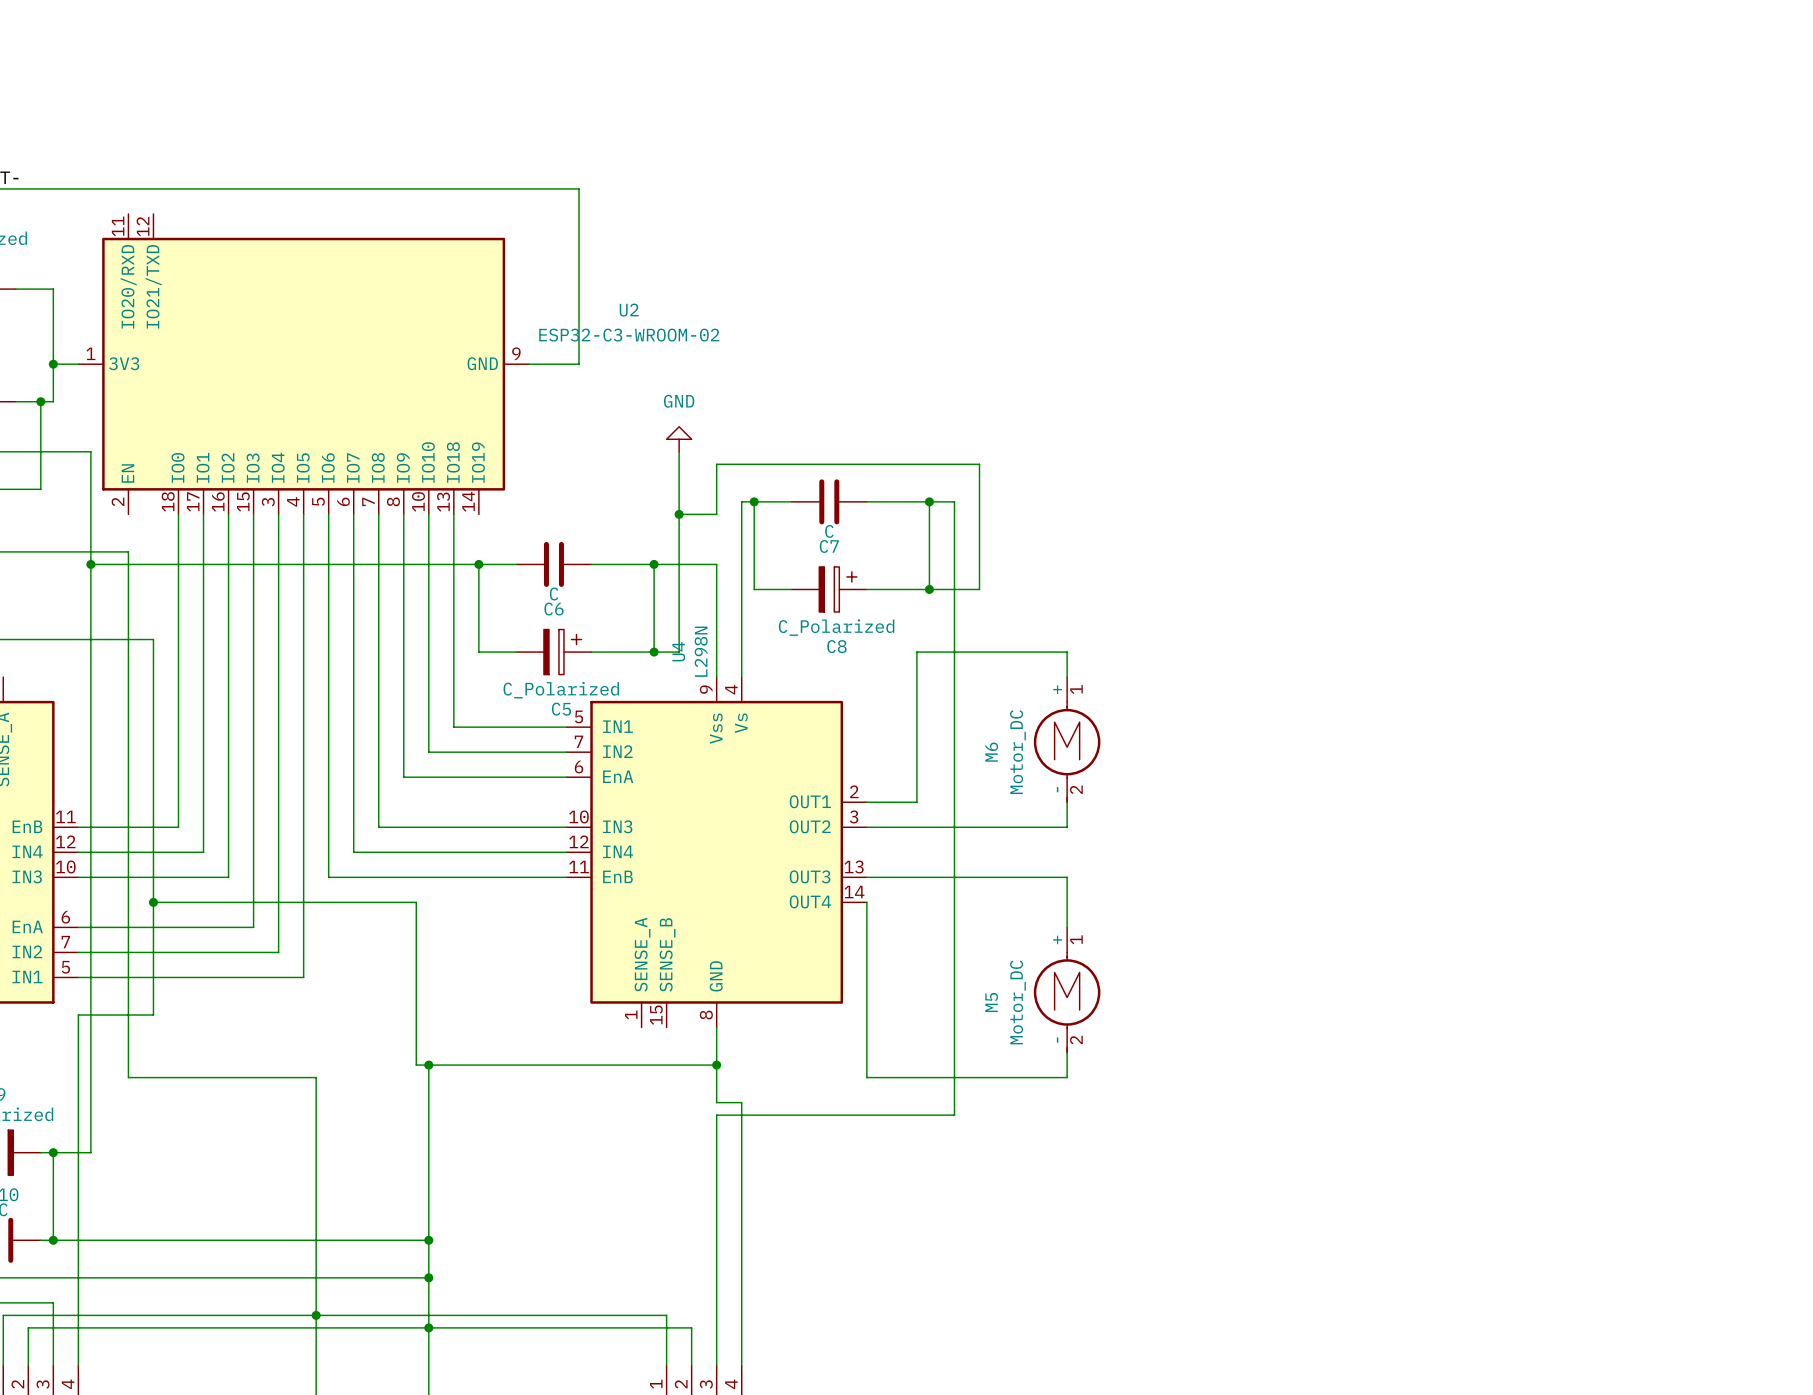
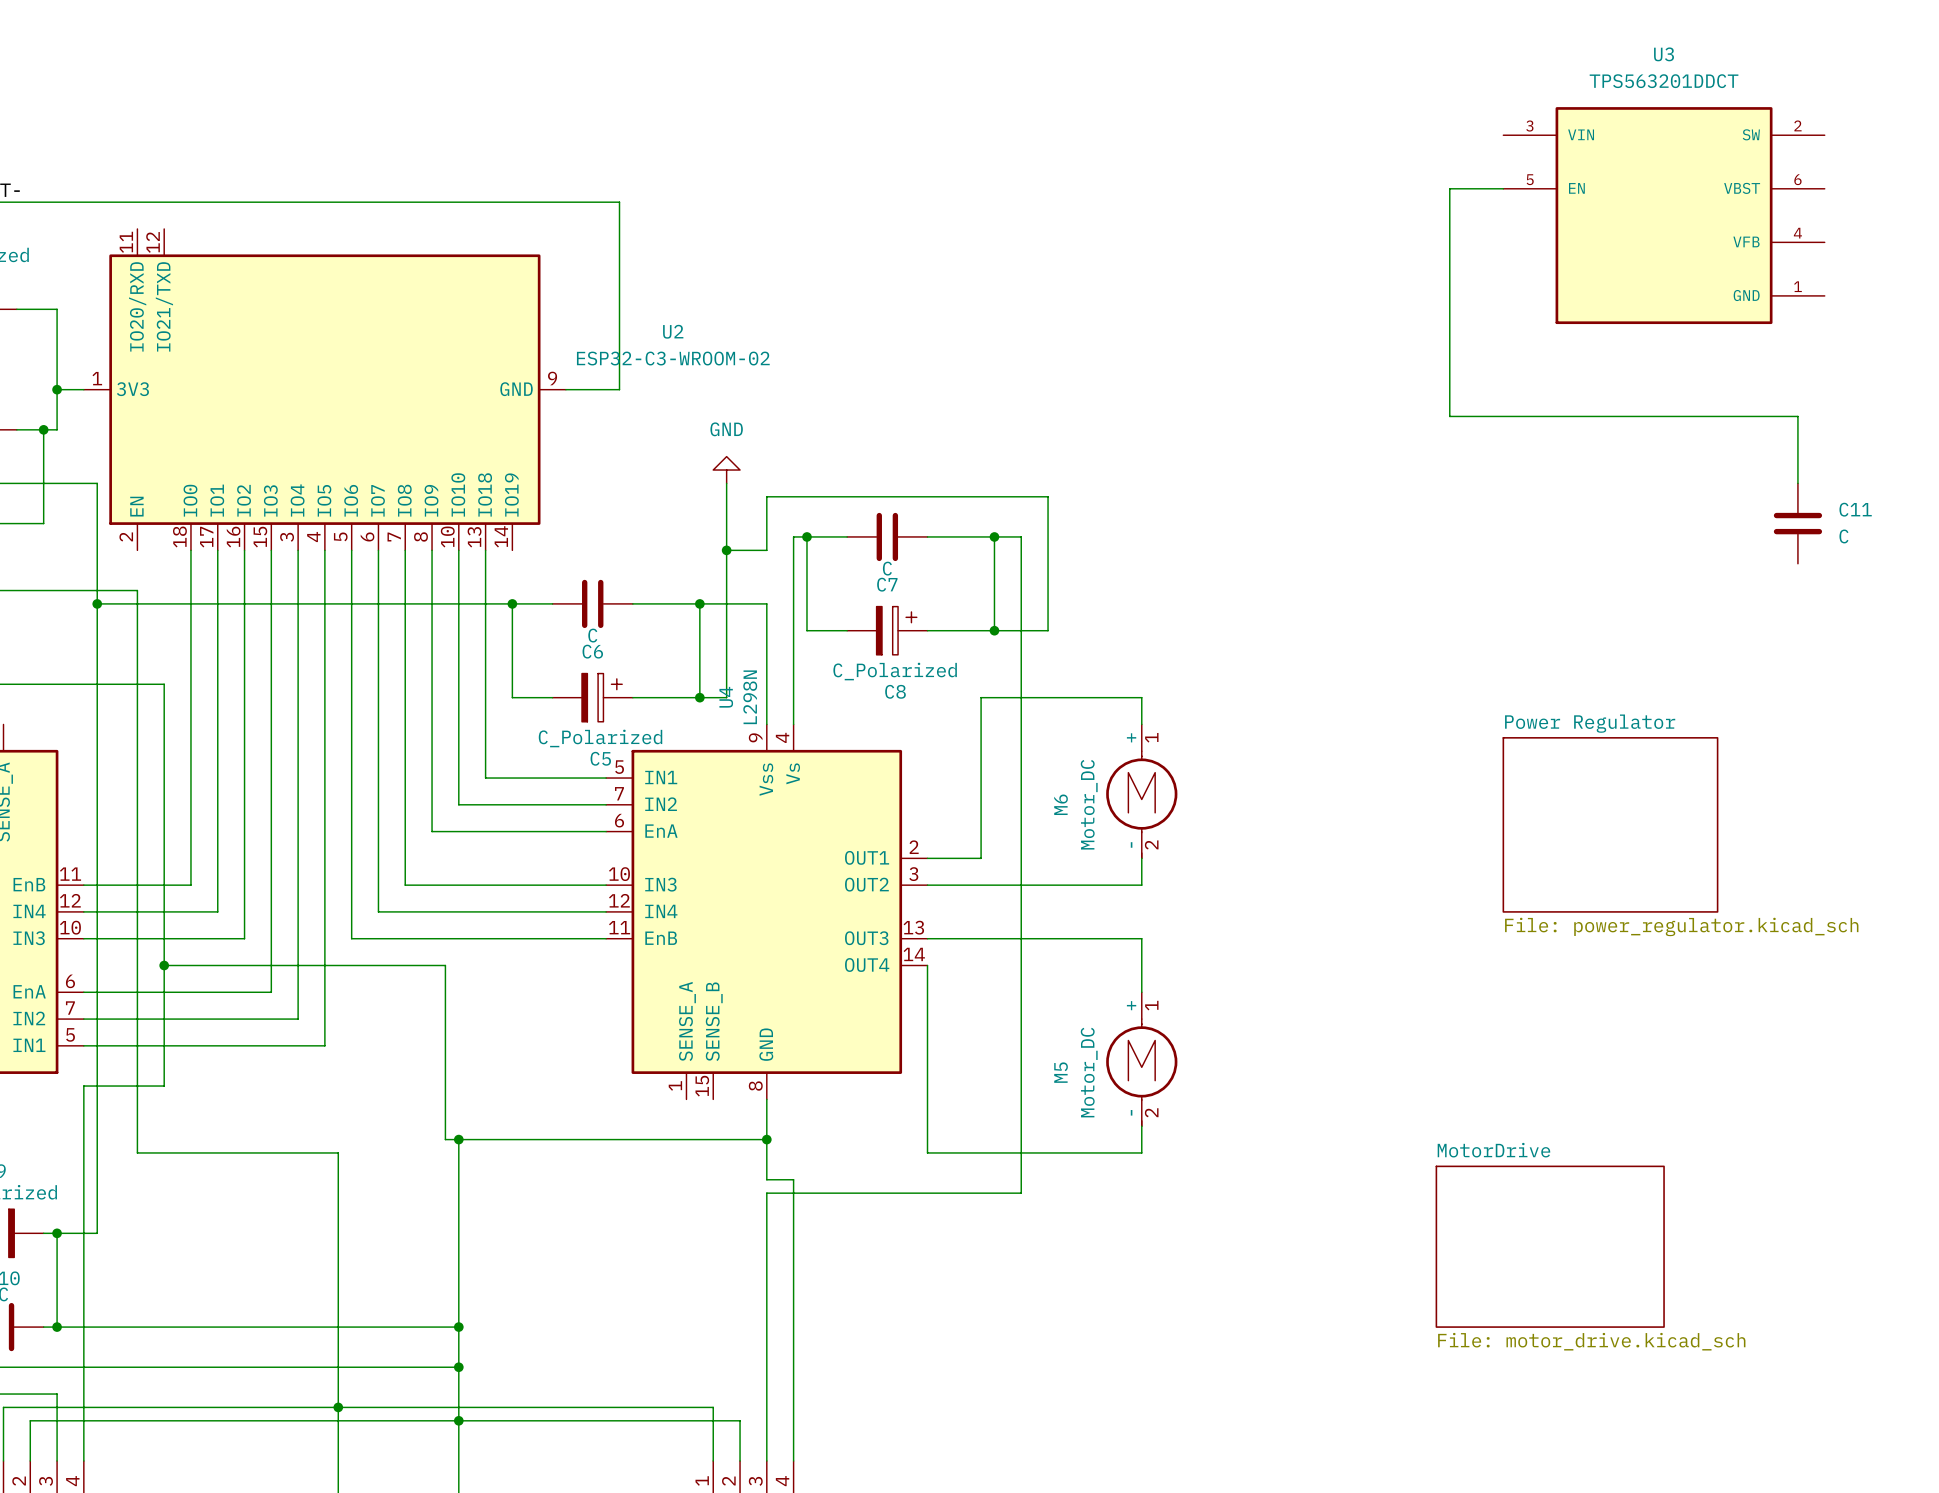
wire: none -> (1503, 188) (1449, 188) (1449, 416) (1797, 416) (1797, 483)
U3: none -> TPS563201DDCT (1664, 215)
C11: none -> C (1797, 523)
sheet Power Regulator: none -> File: power_regulator.kicad_sch (1610, 824)
sheet MotorDrive: none -> File: motor_drive.kicad_sch (1550, 1246)

